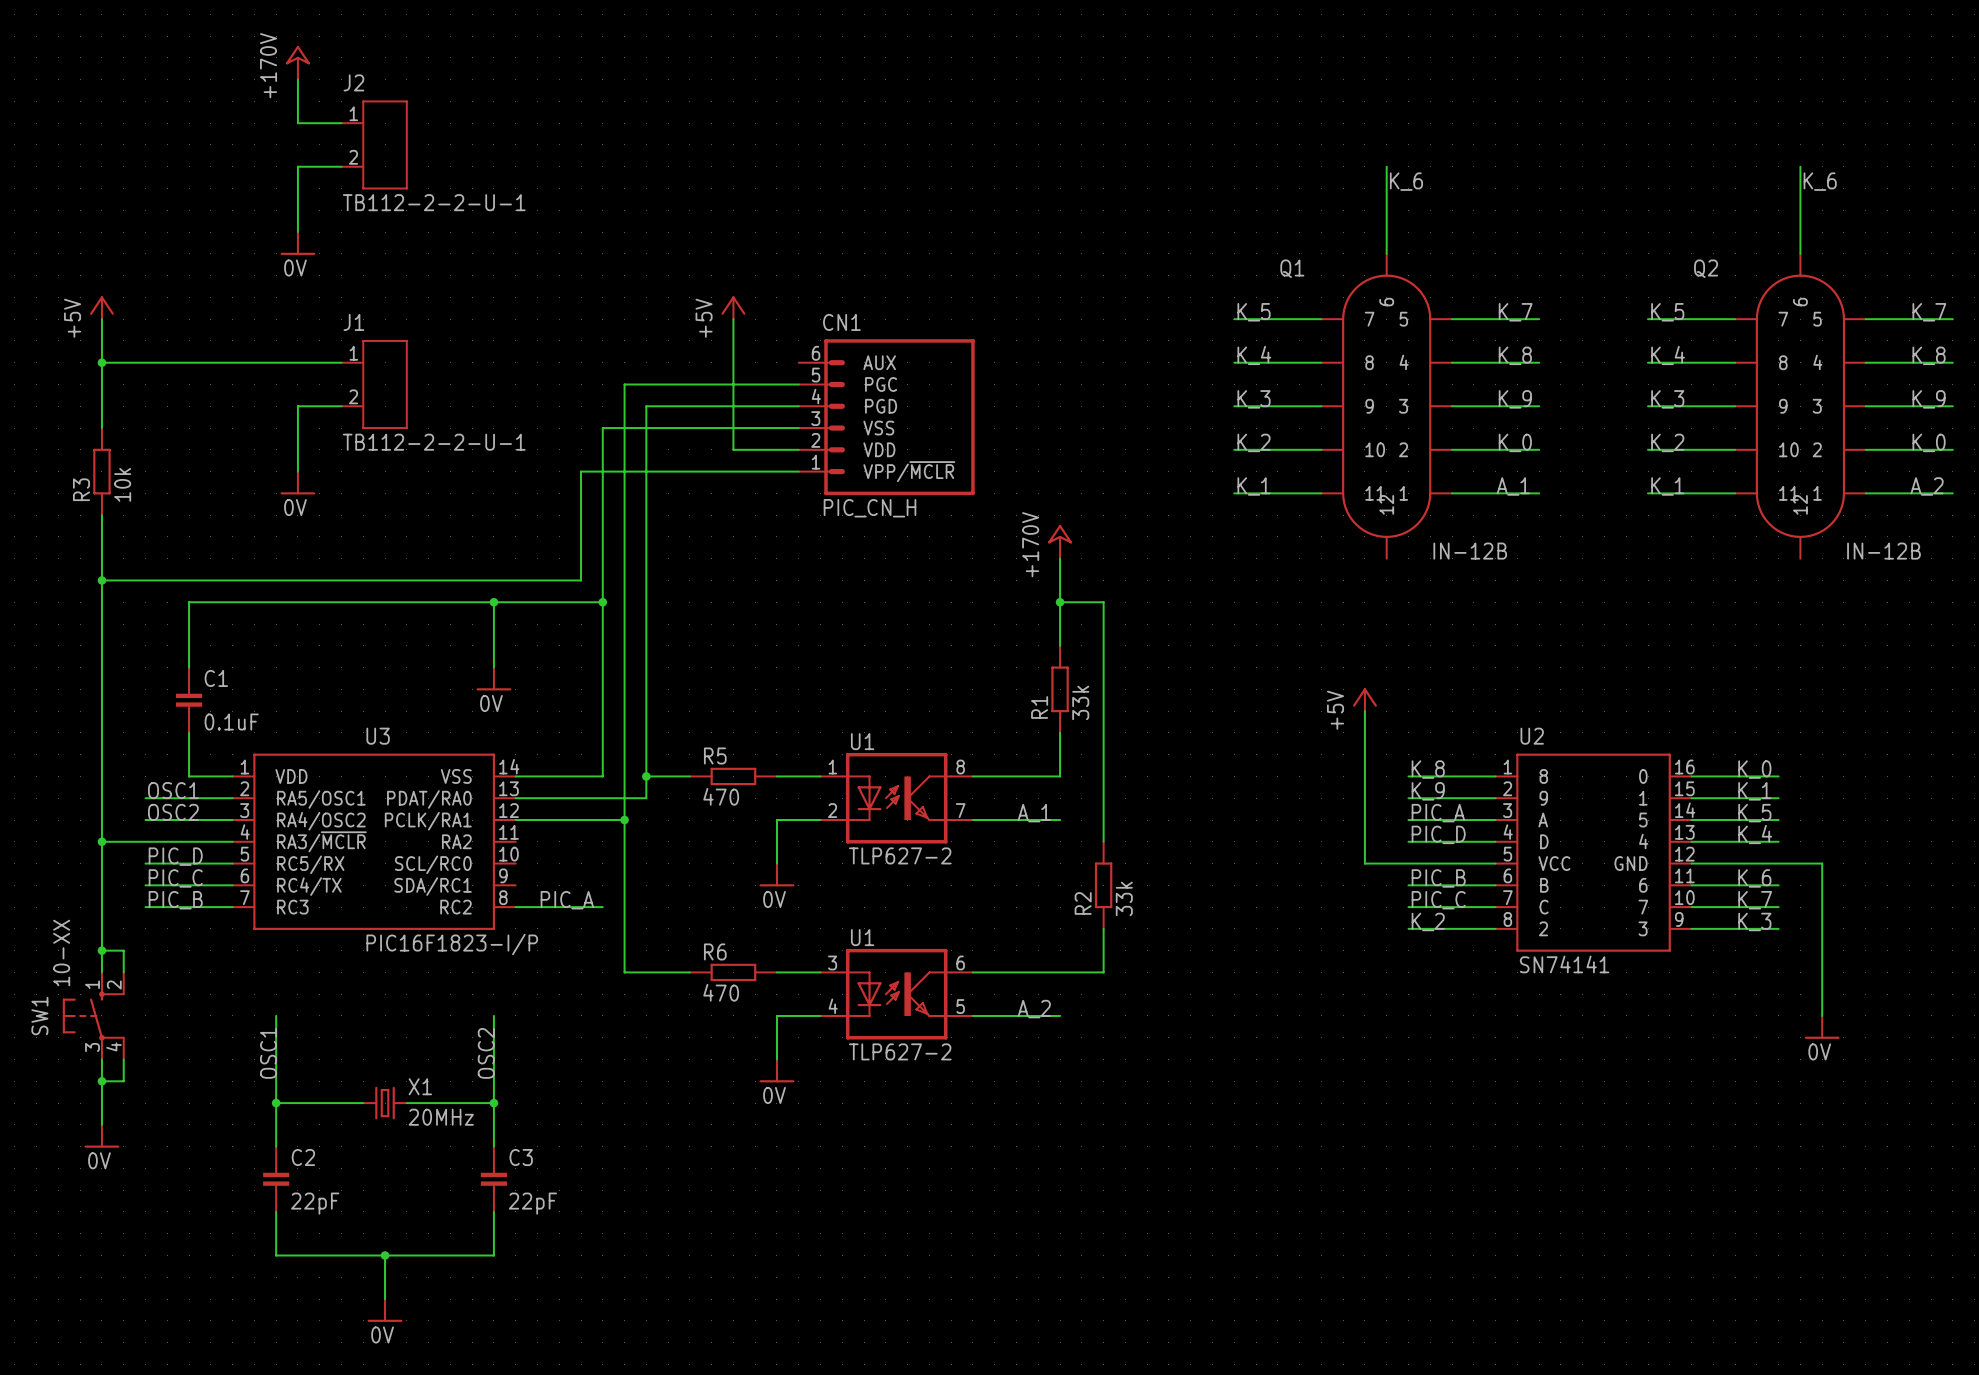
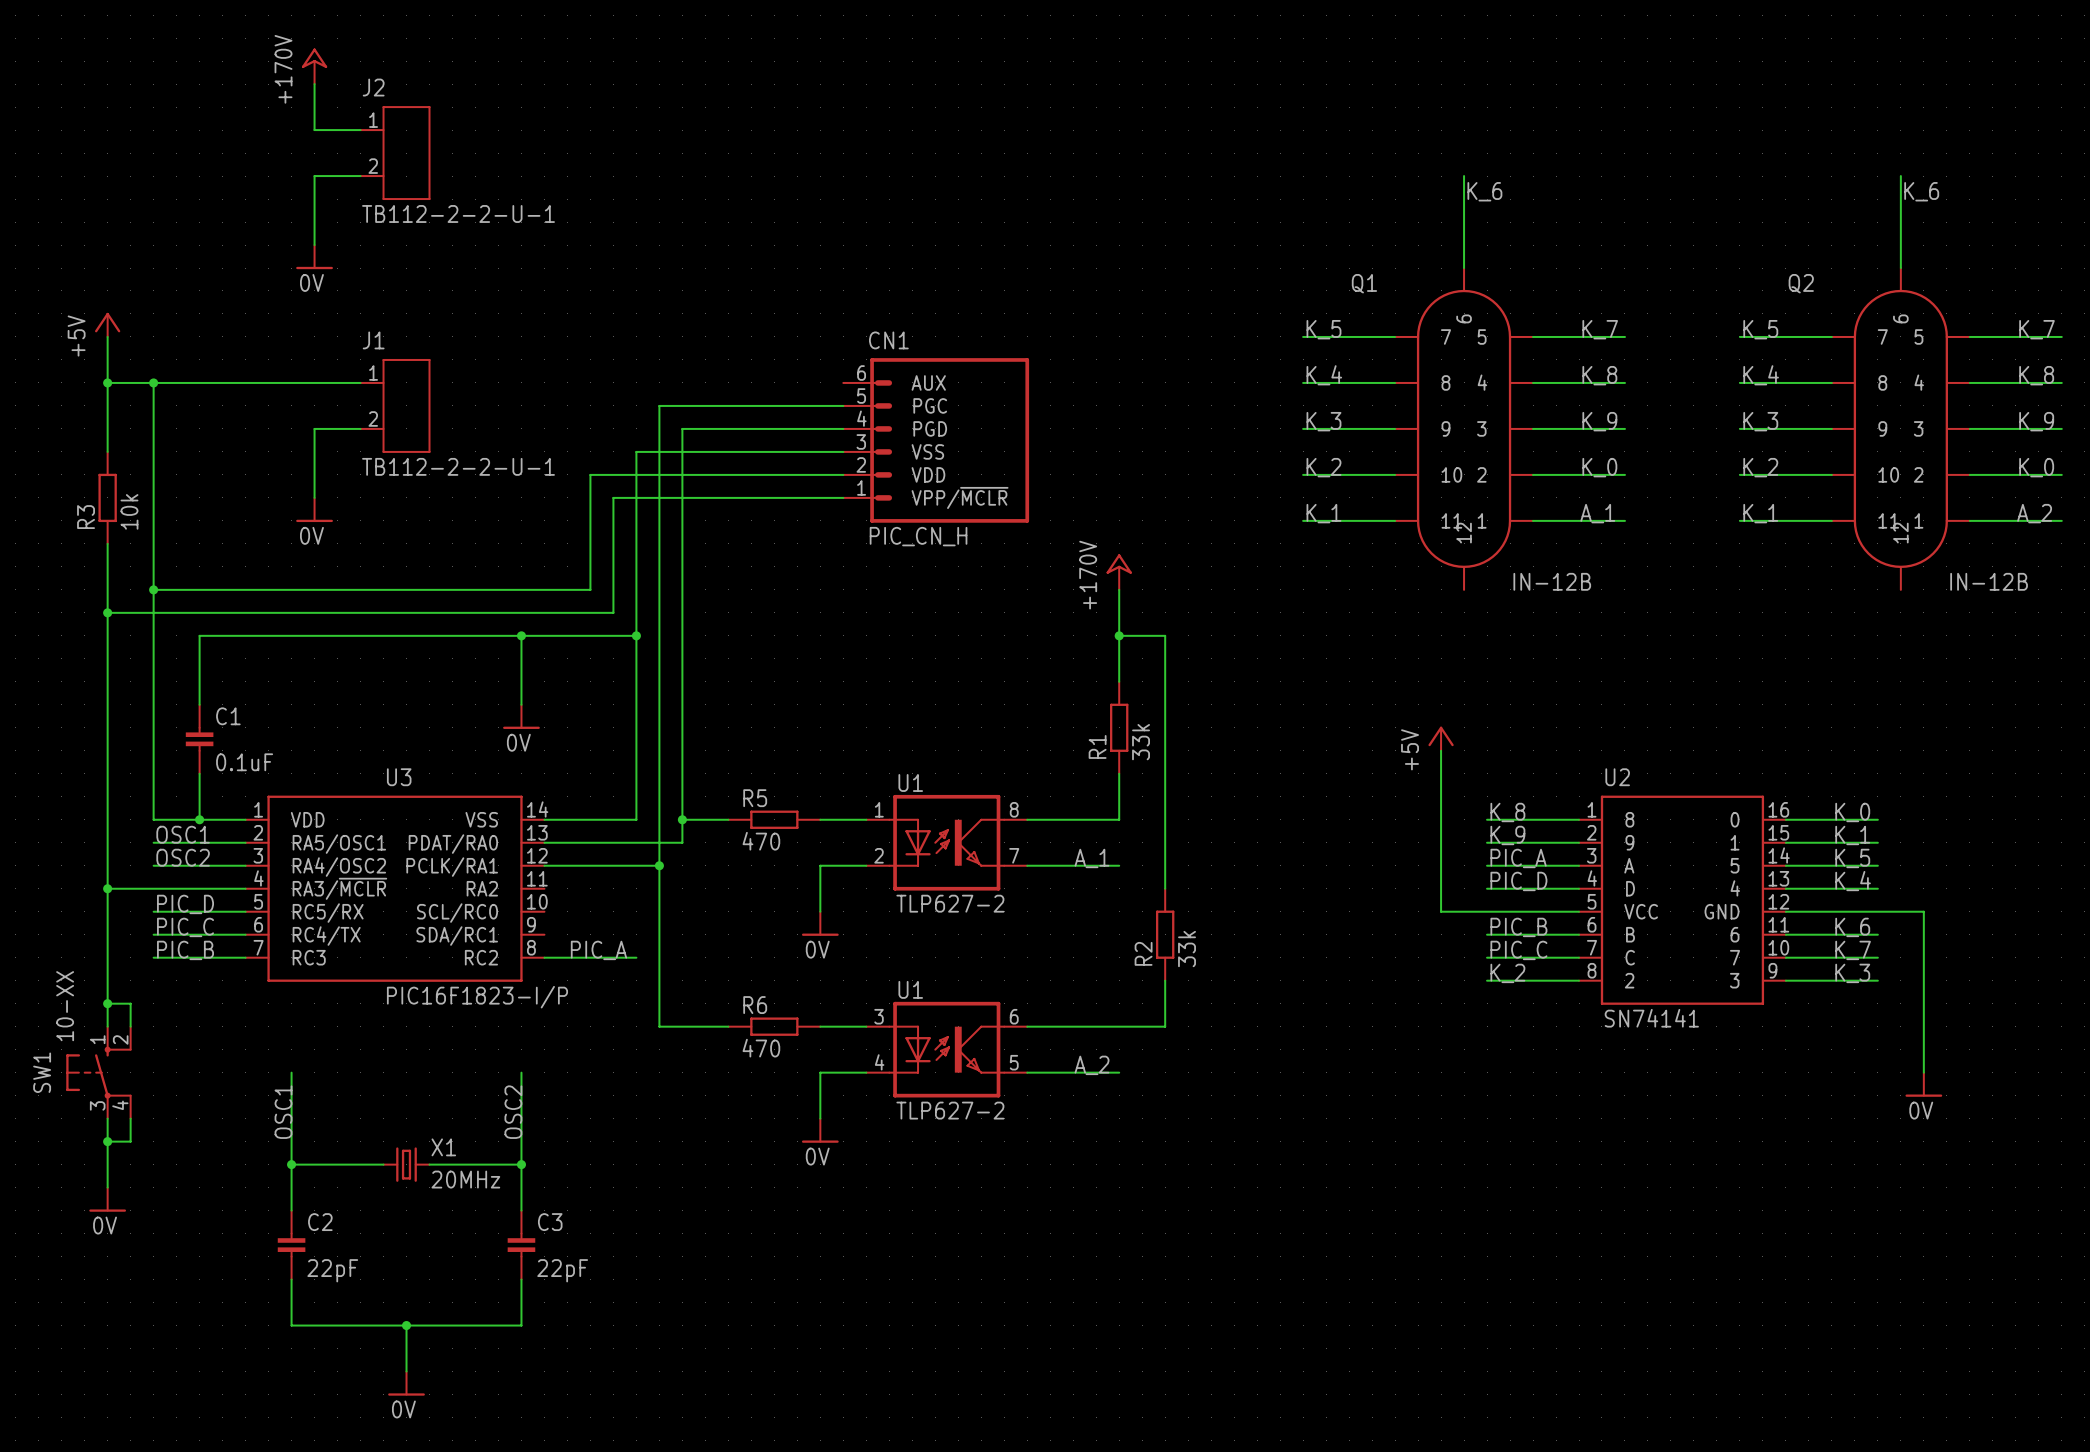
power symbol: +5V (733, 307) -> none
wire: (733, 319) (733, 449) -> (153, 589) (590, 589) (590, 474) (774, 474)
wire: none -> (153, 382) (153, 819) (199, 819)
junction: none -> (153, 382)
junction: none -> (153, 589)
junction: none -> (199, 819)

